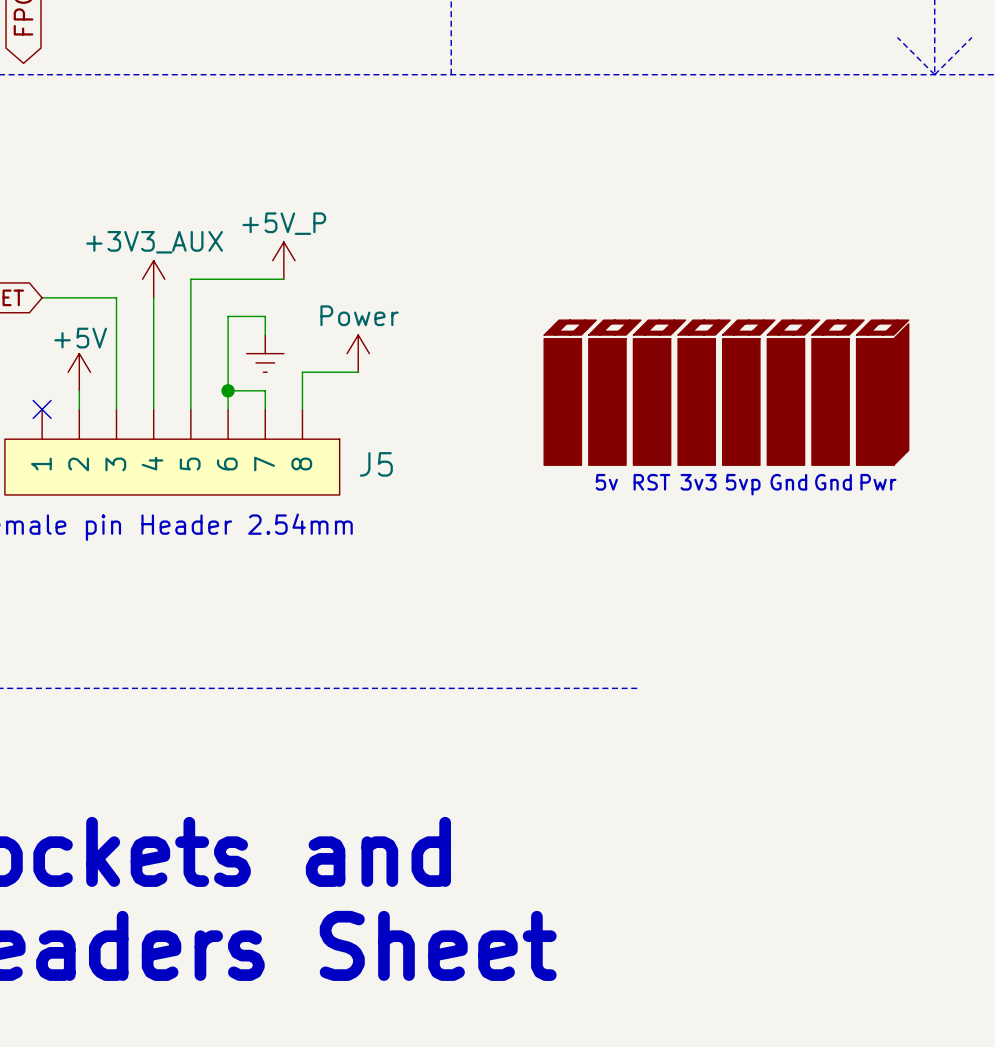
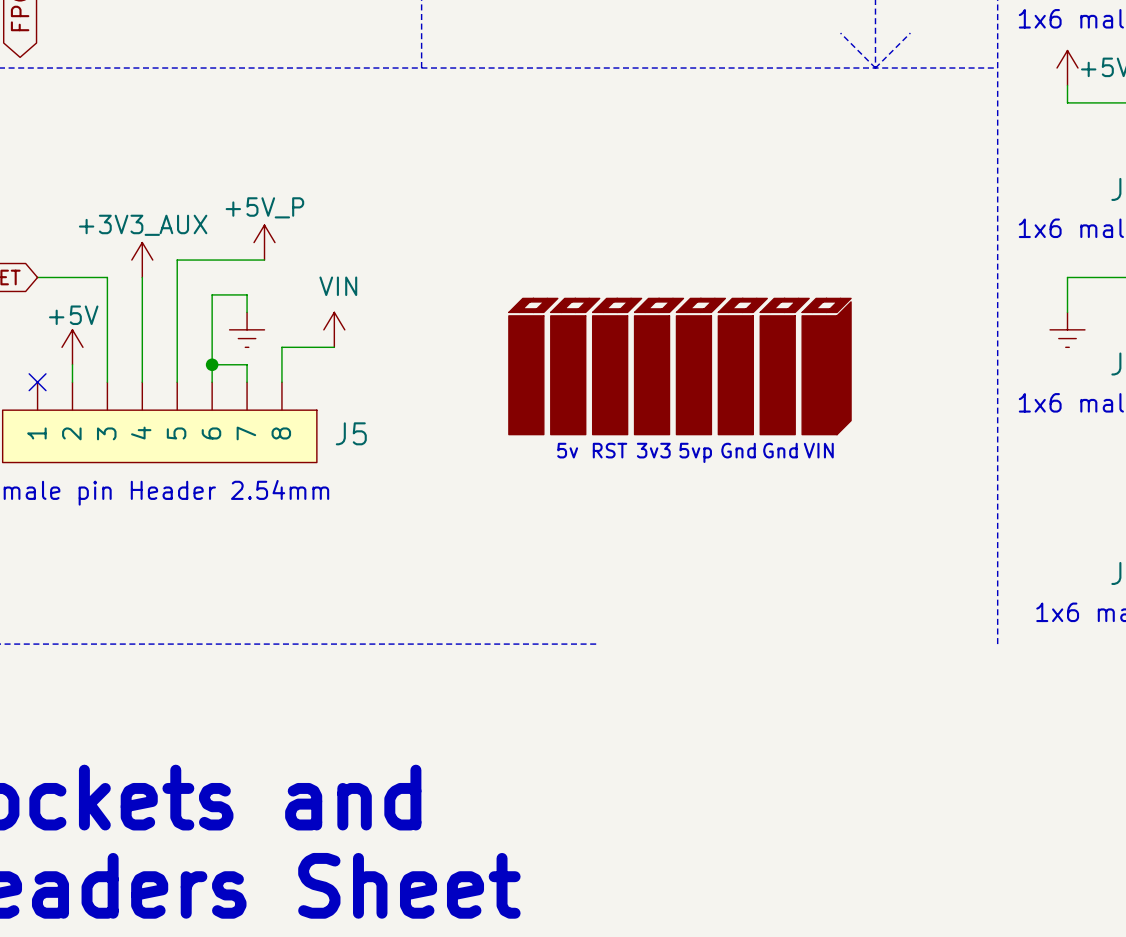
power symbol: Power (358, 353) -> VIN (334, 329)
text: Pwr (878, 482) -> VIN (818, 450)

